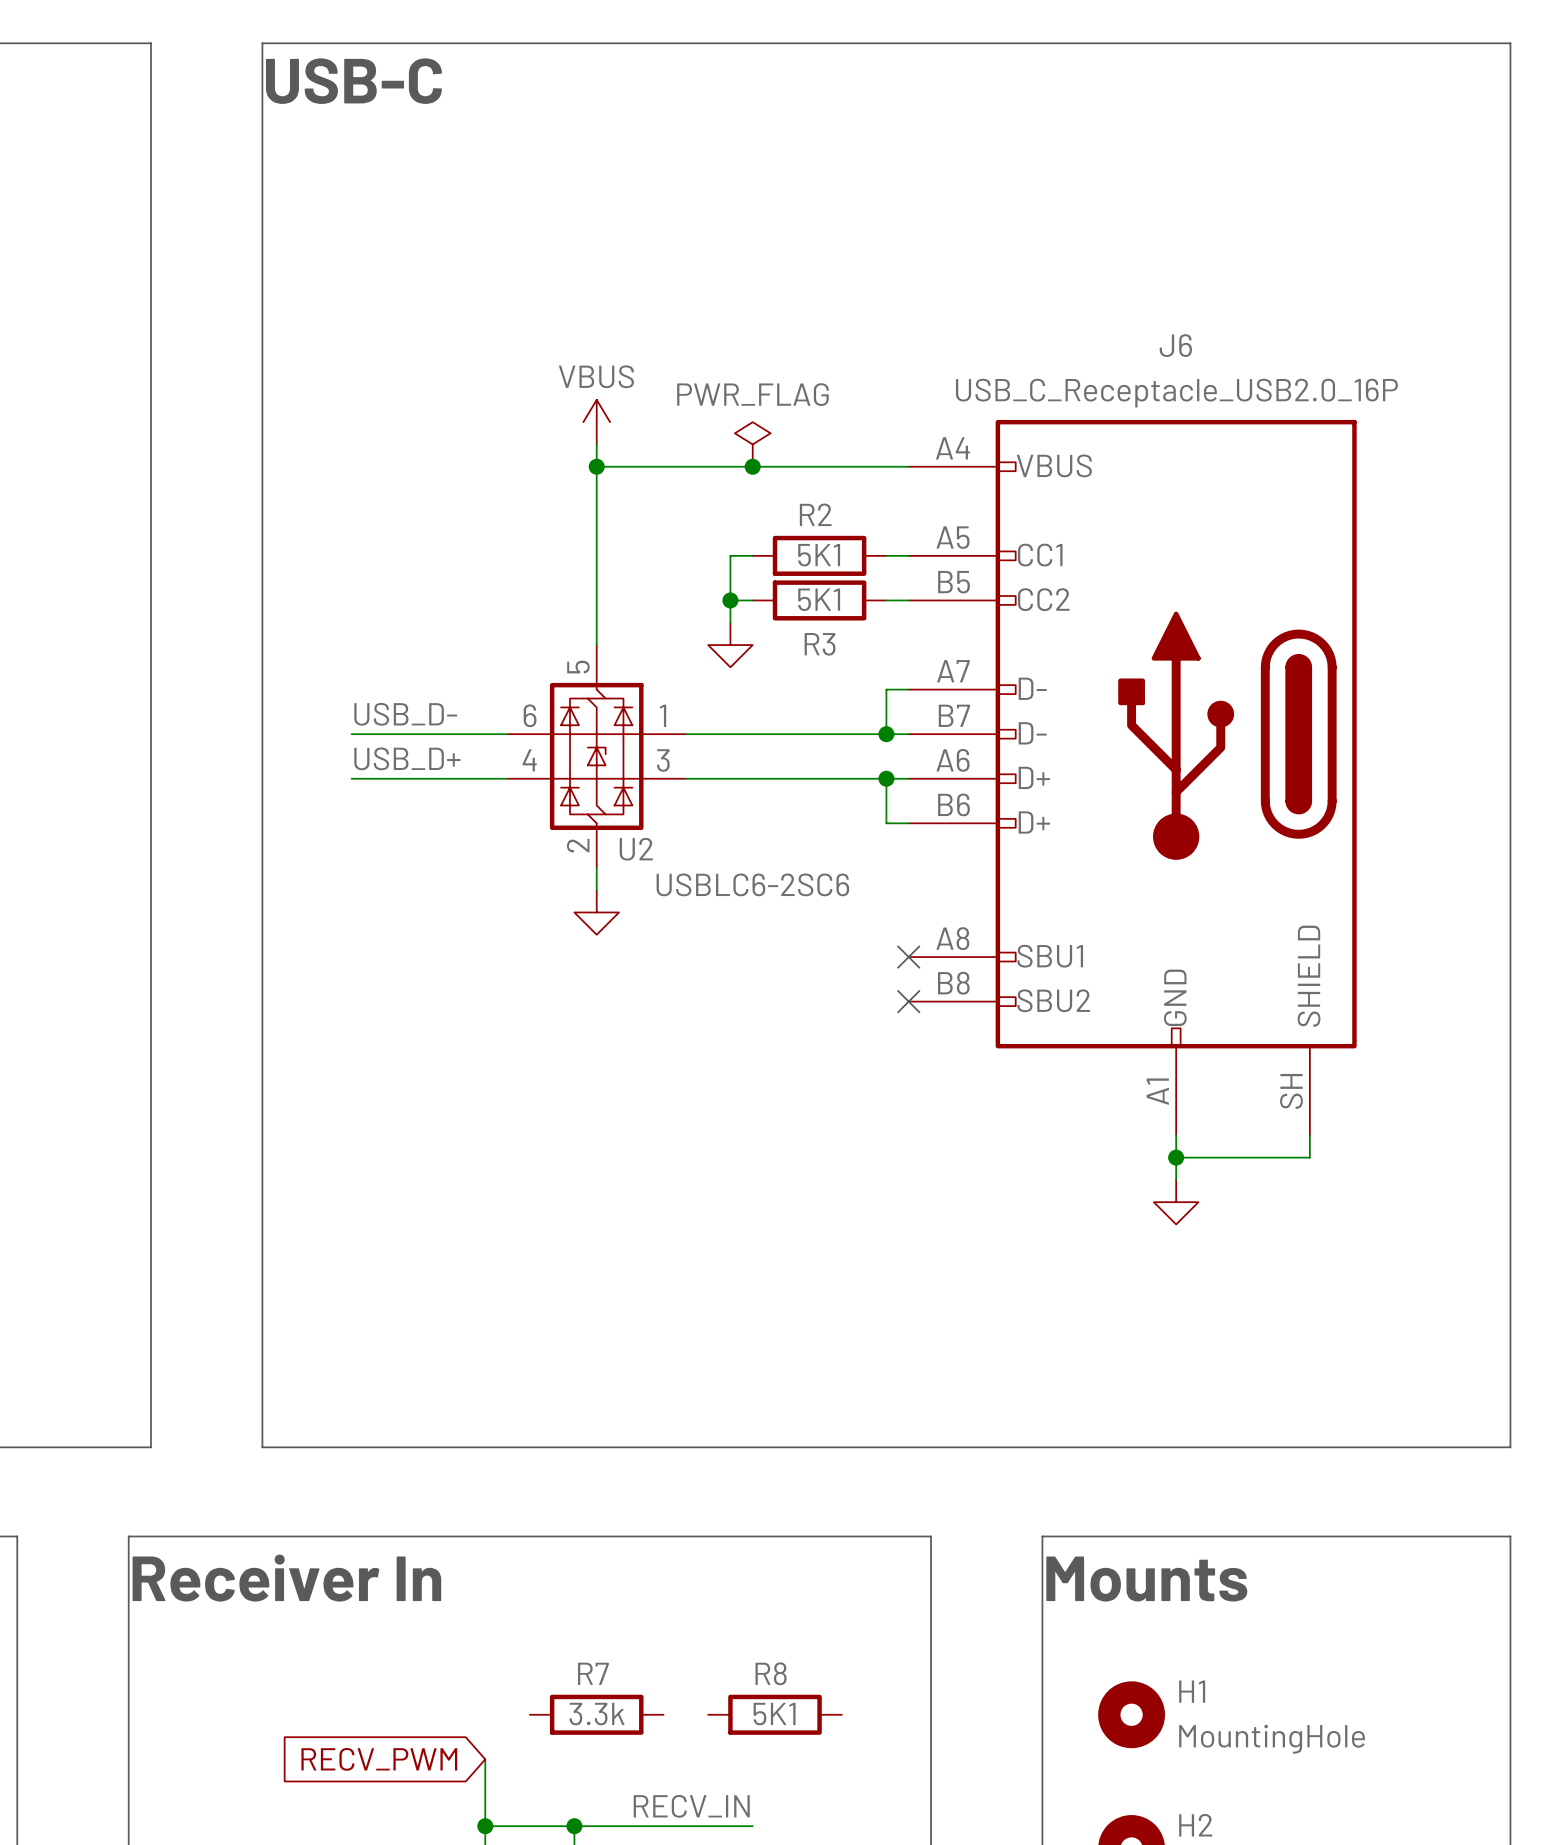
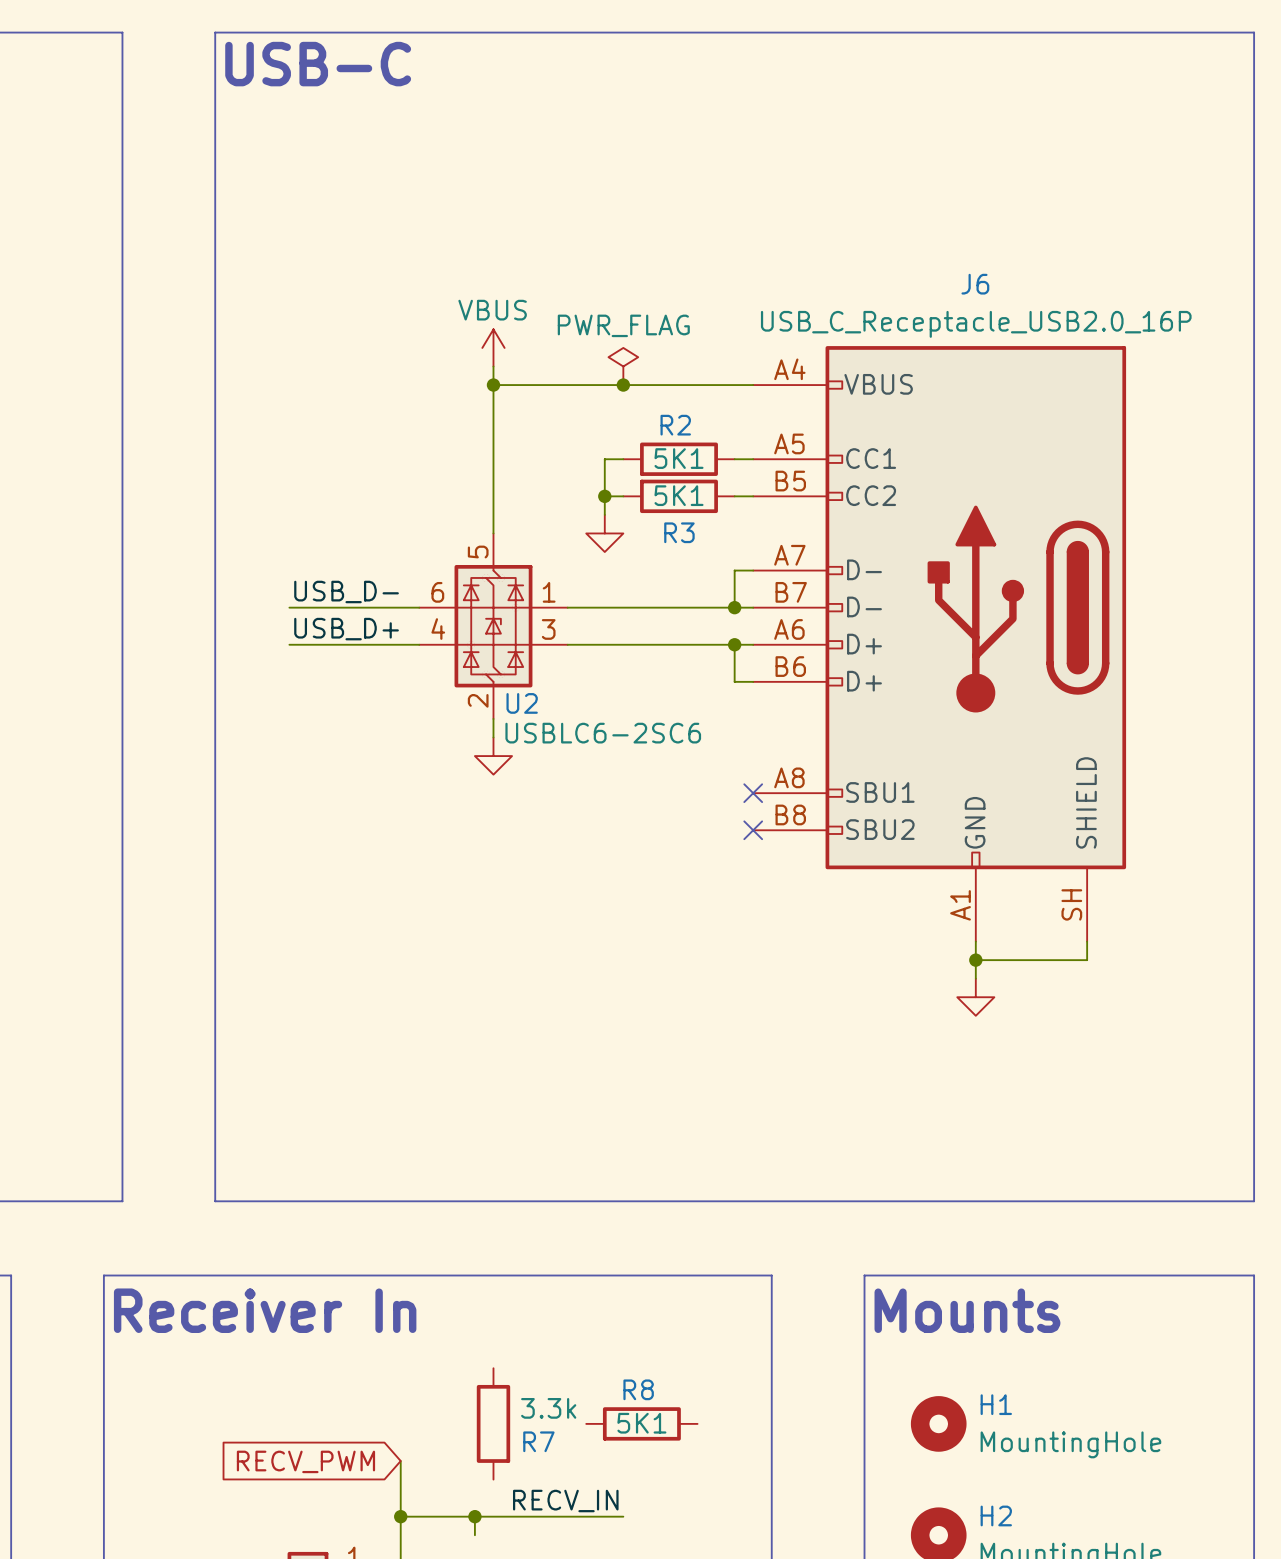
R7 rotation: 0° (596, 1714) -> 90° clockwise (493, 1423)
R7 value position: 3.3k (597, 1714) -> 3.3k (548, 1408)

